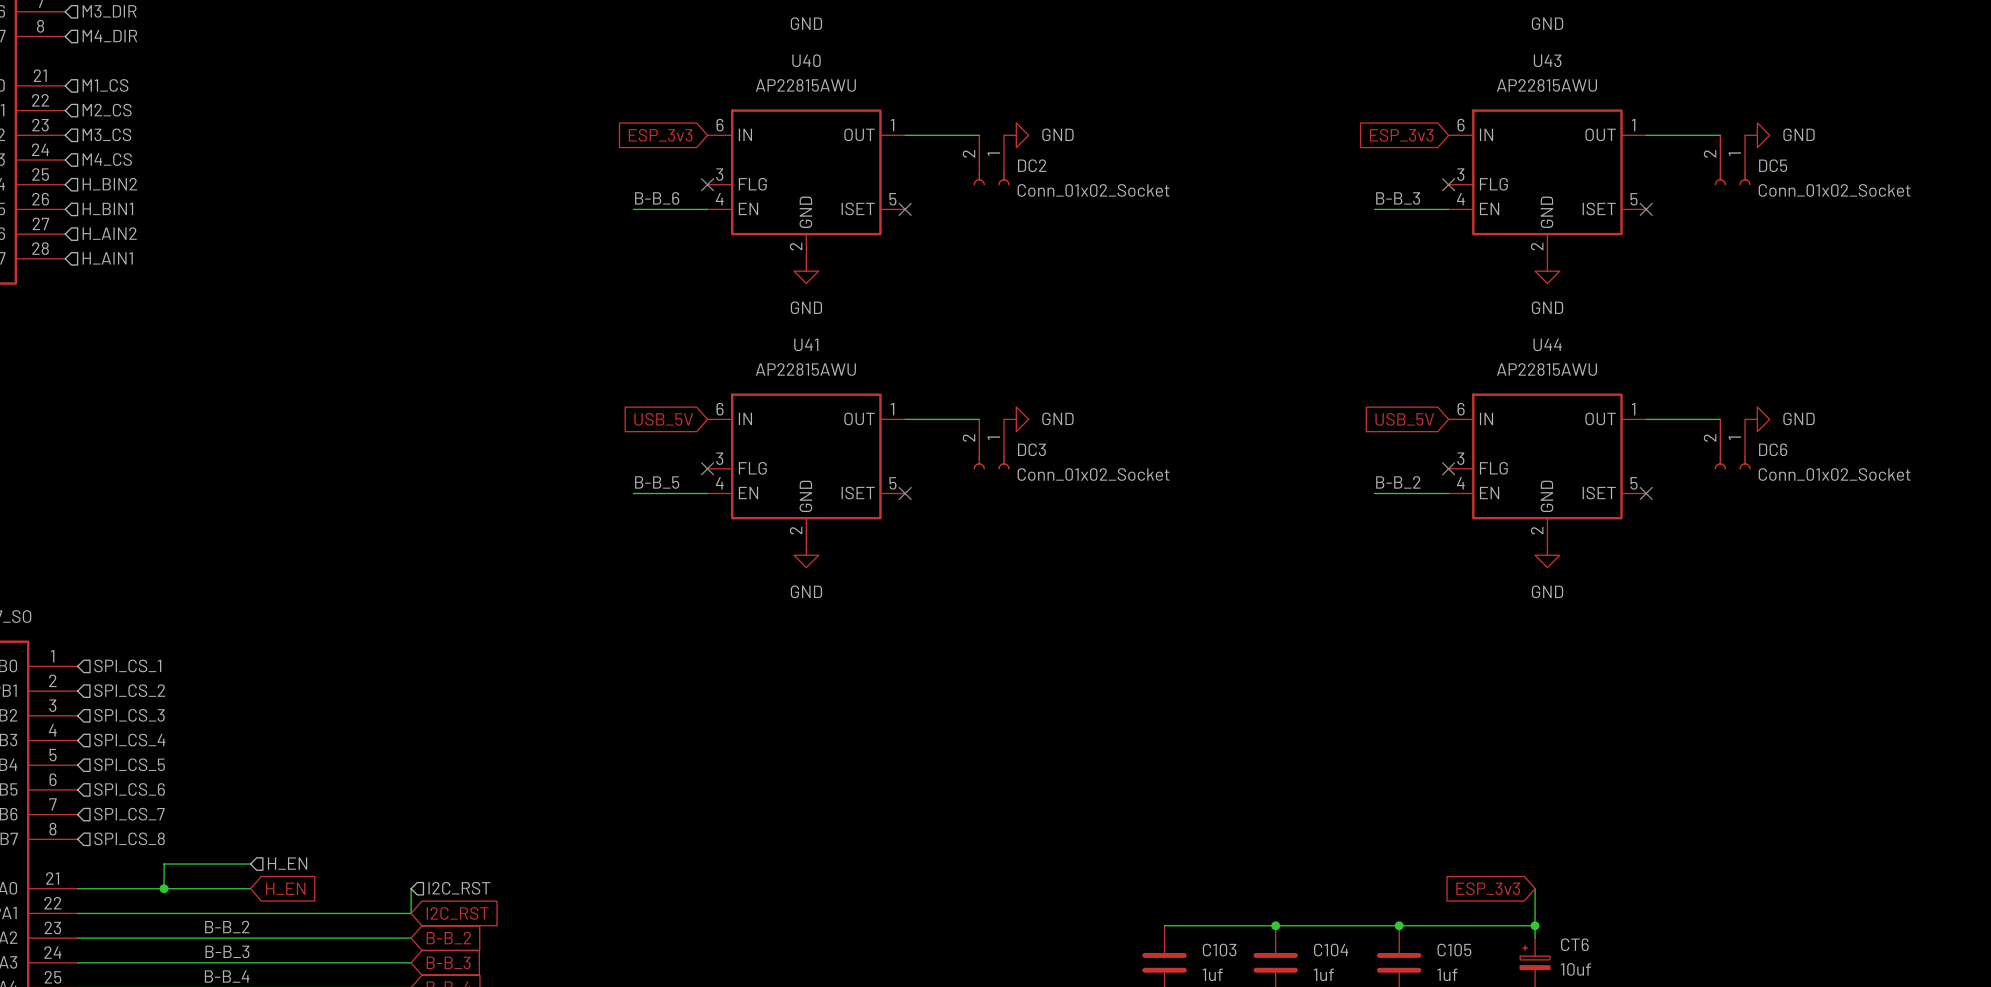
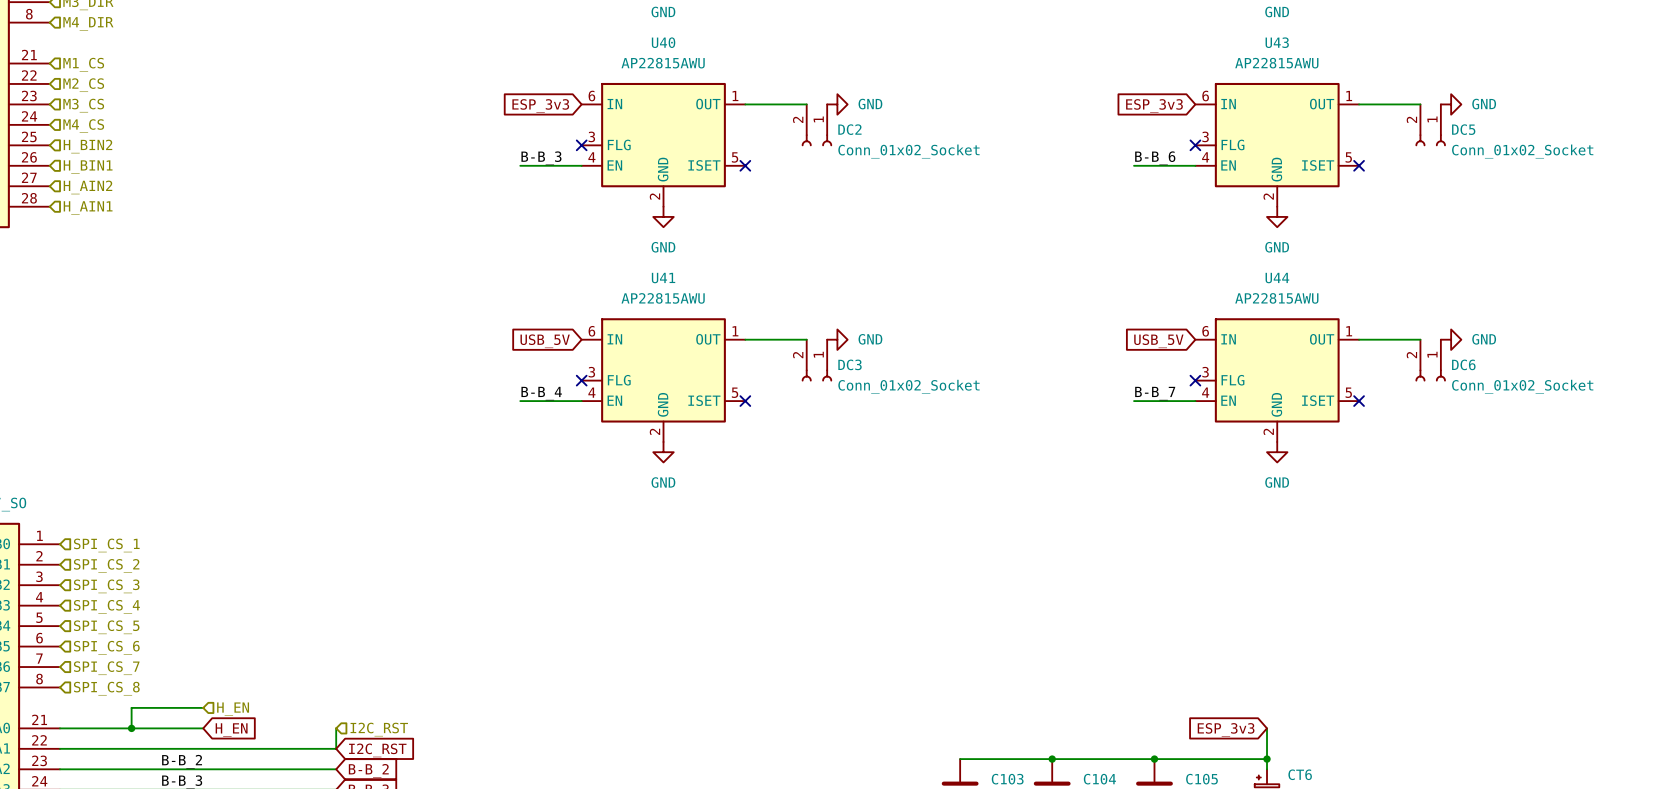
label: B-B_6 (657, 198) -> B-B_3 (541, 158)
label: B-B_3 (1398, 198) -> B-B_6 (1155, 158)
label: B-B_5 (657, 482) -> B-B_4 (541, 393)
label: B-B_2 (1398, 482) -> B-B_7 (1155, 393)

